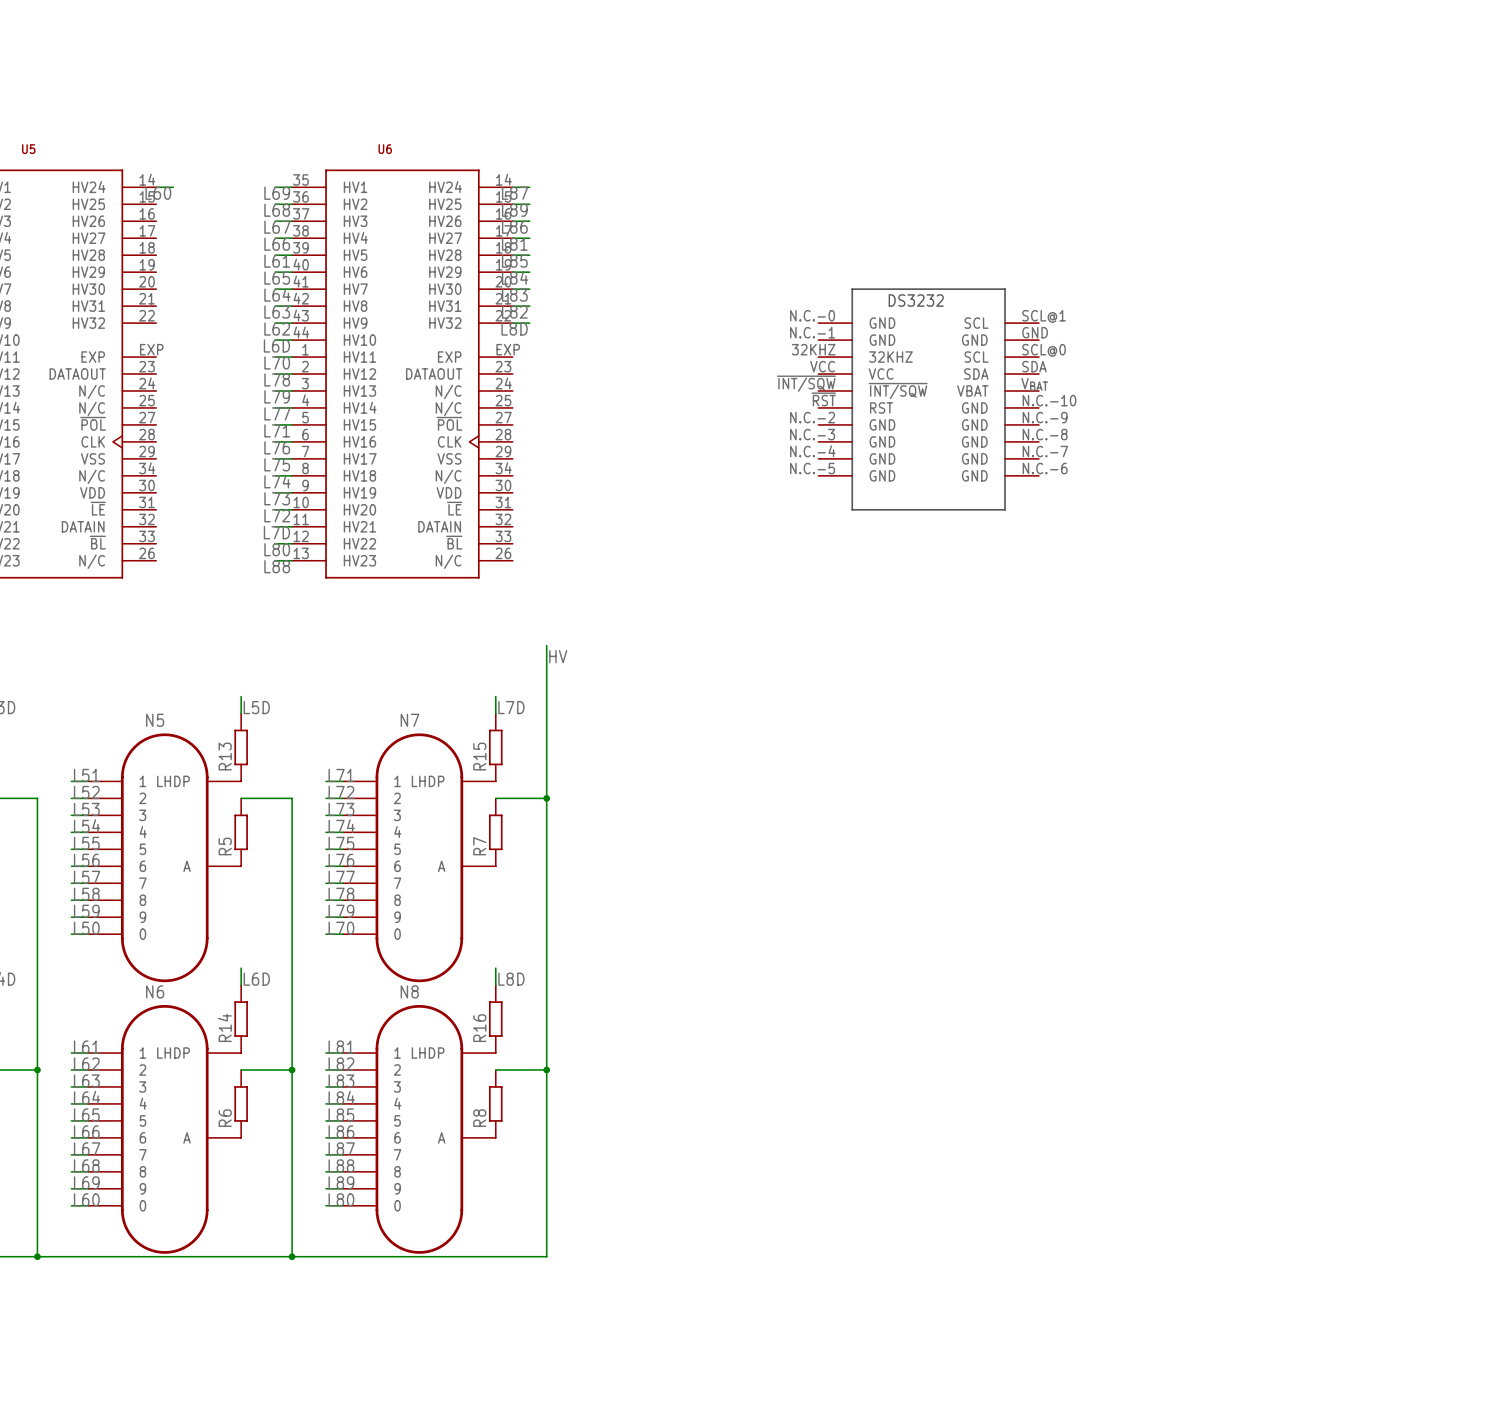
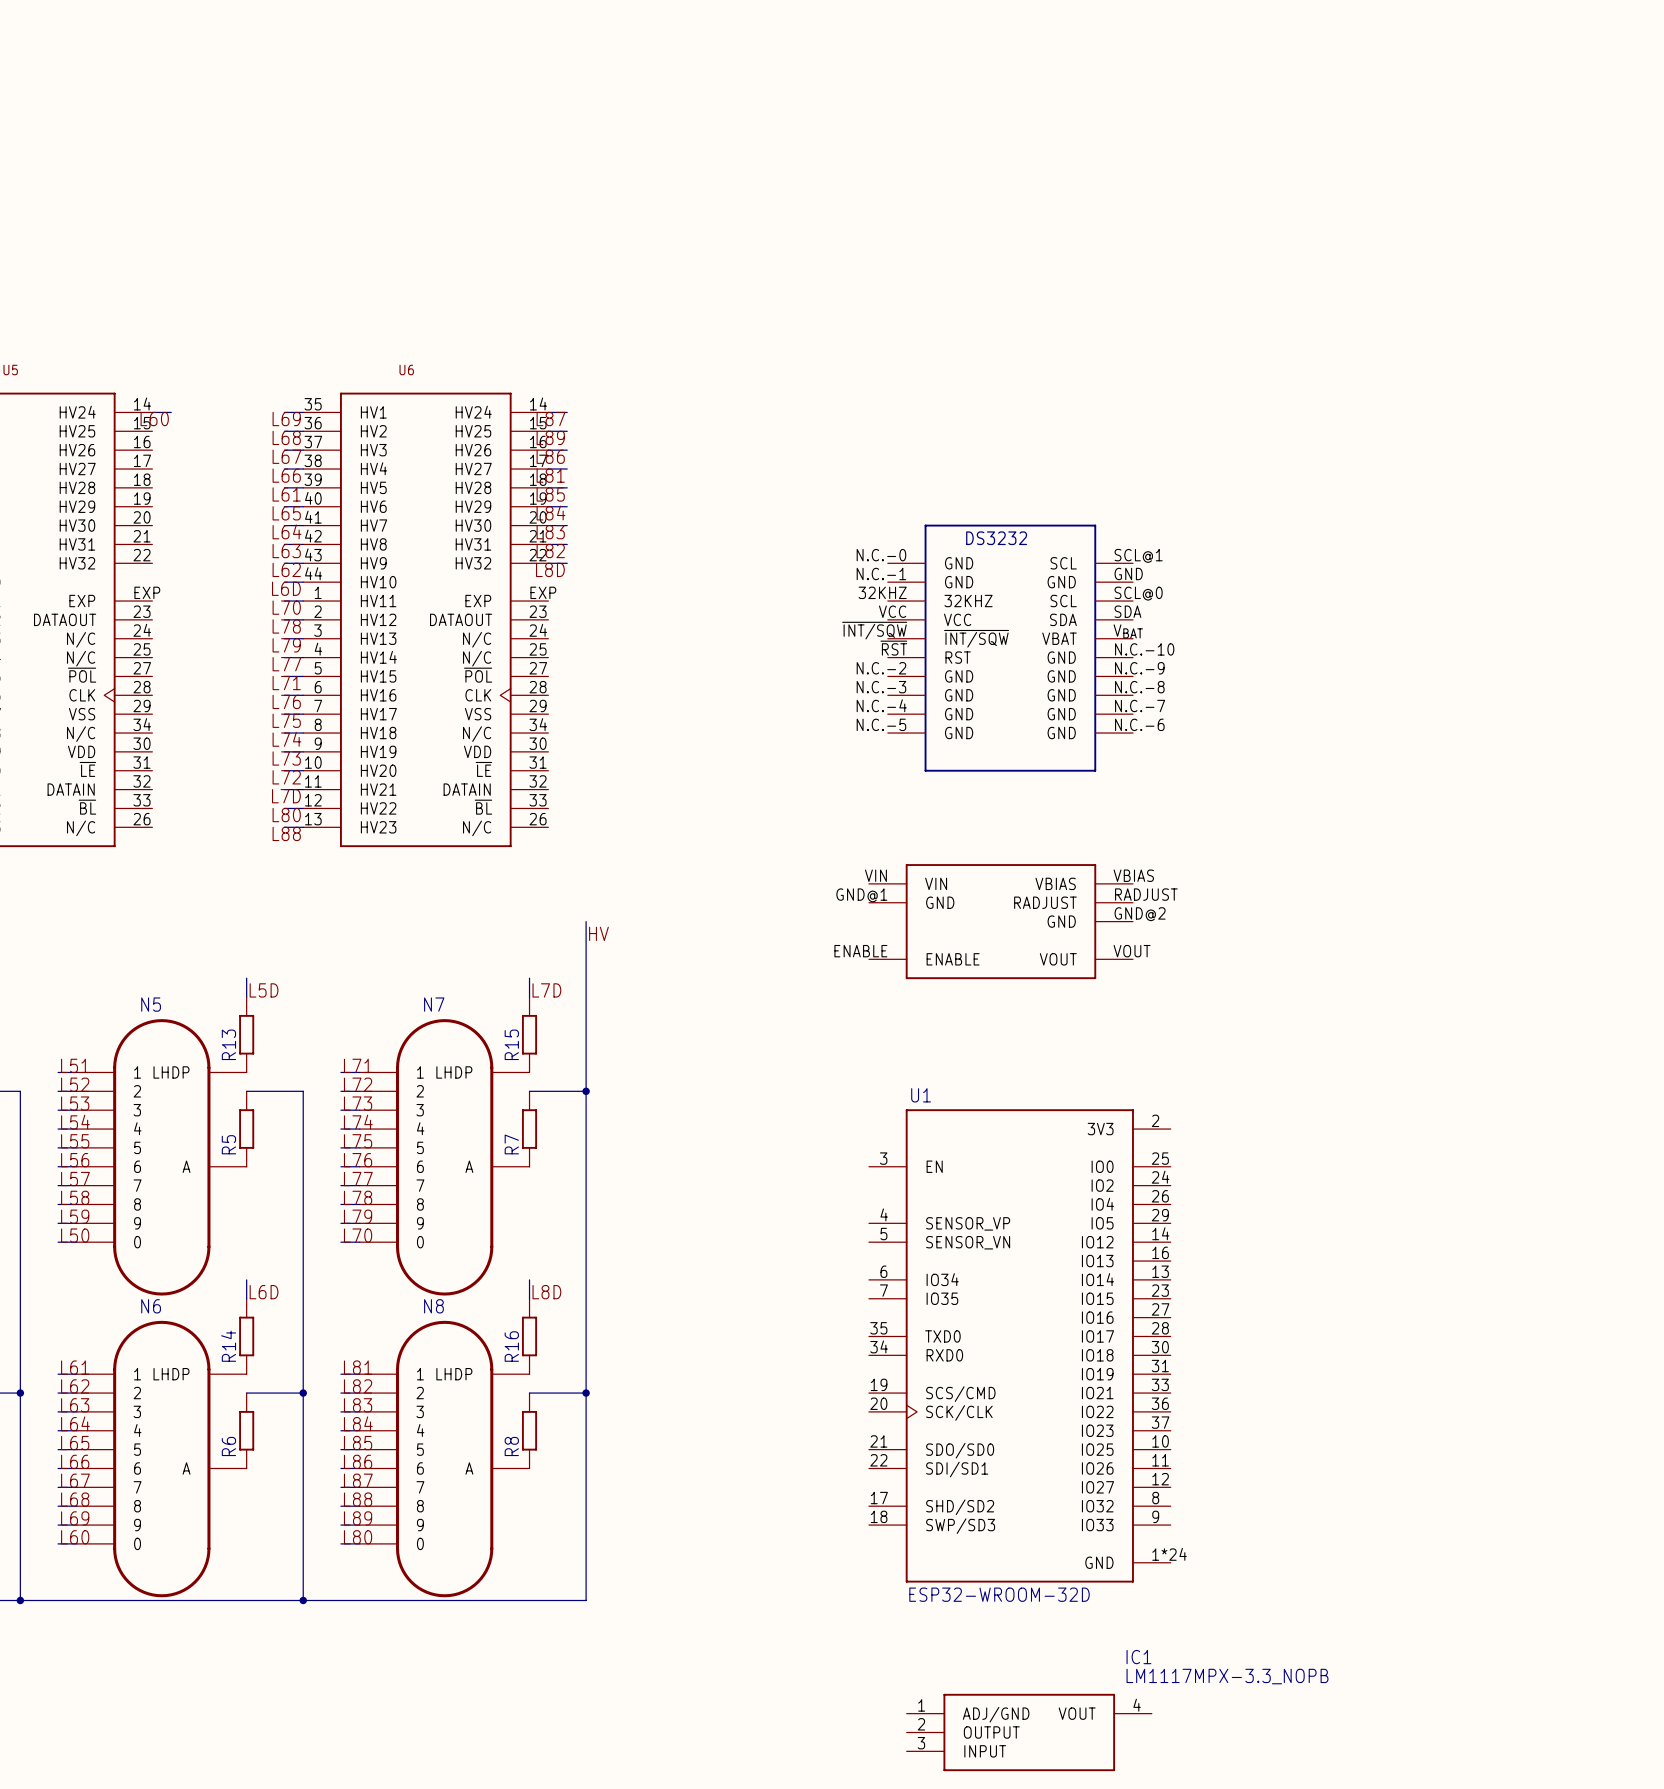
part: none -> (1000, 921)
U1: none -> ESP32-WROOM-32D (1019, 1345)
IC1: none -> LM1117MPX-3.3_NOPB (1029, 1732)

